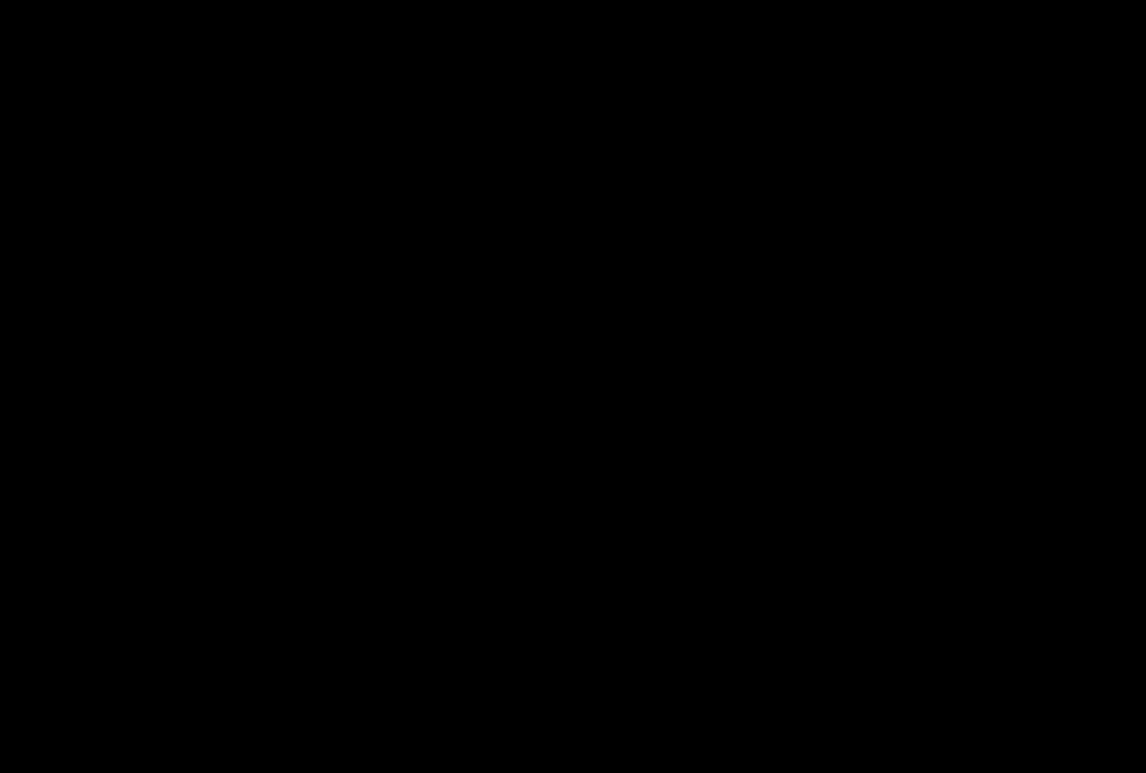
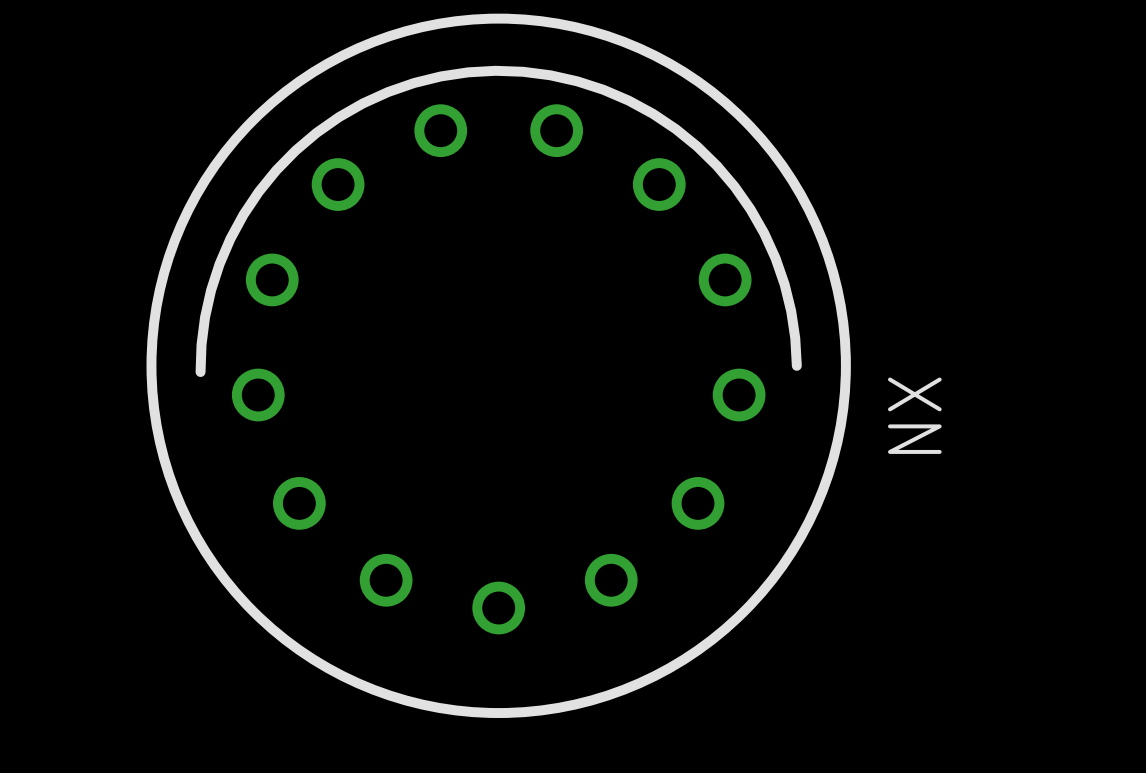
NX: none -> (498, 365)

